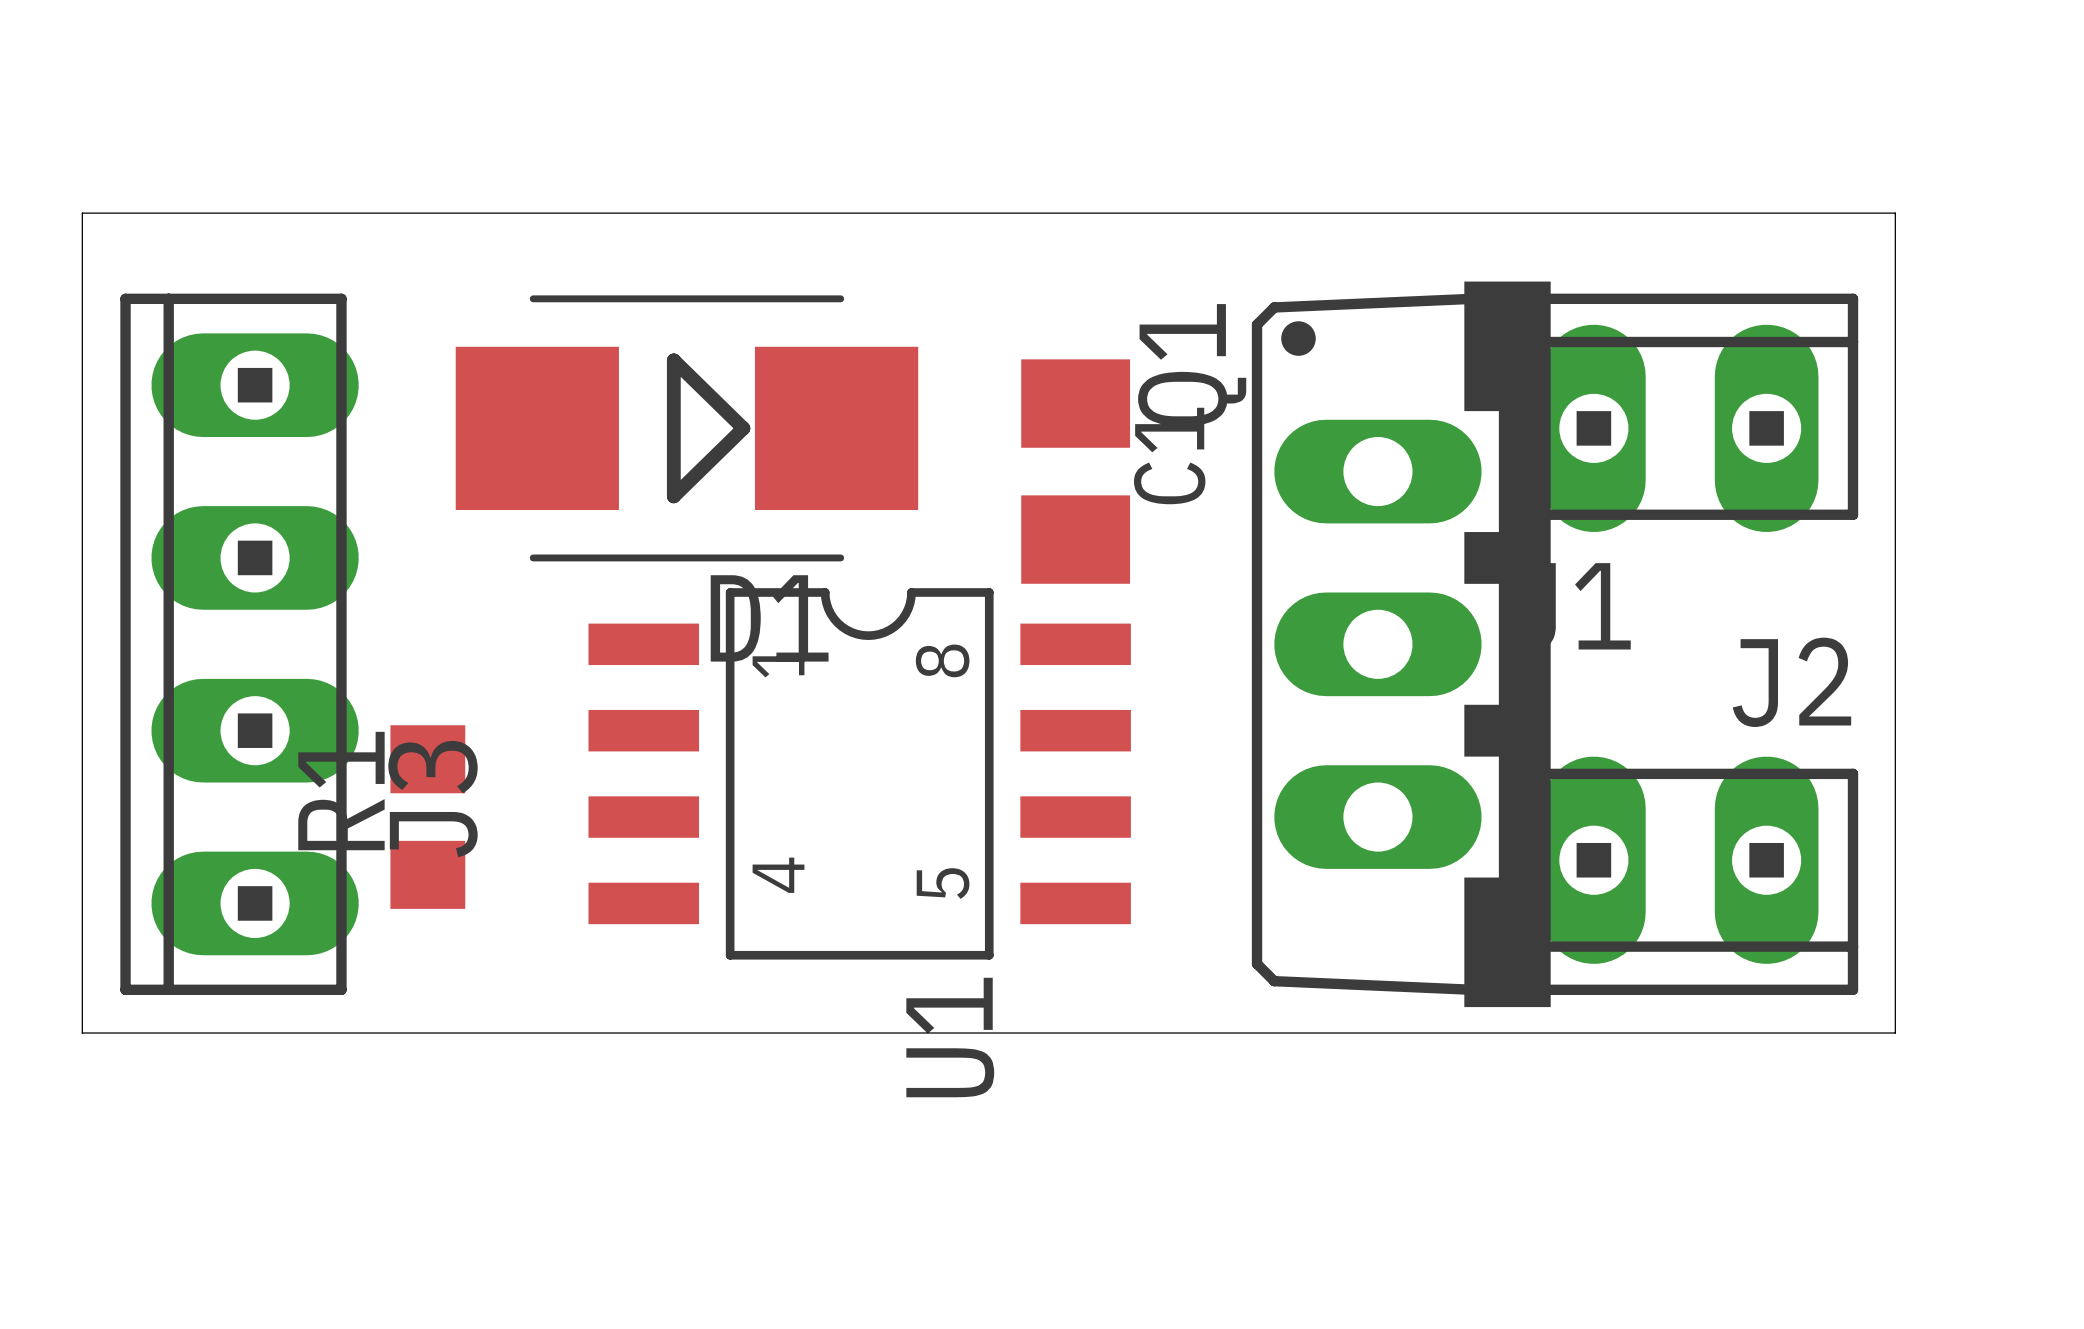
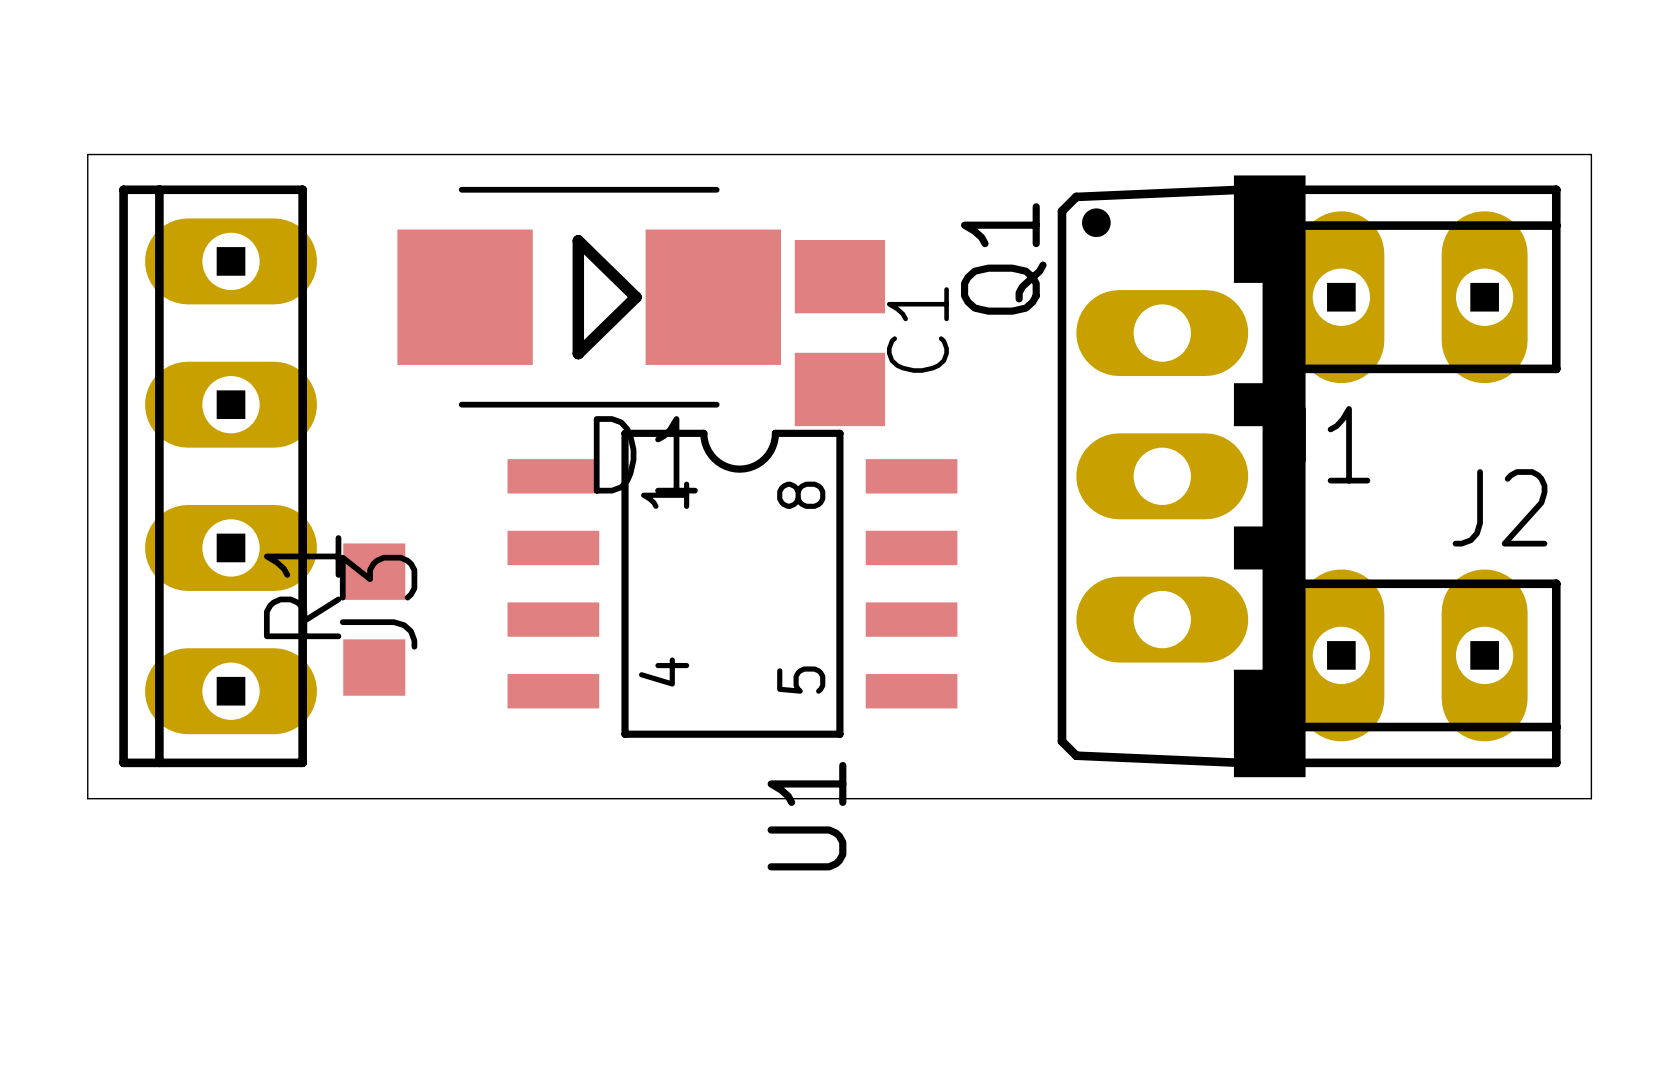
board edge: (82, 256) (82, 213) (1895, 213) (1895, 256) -> (87, 154) (1591, 154)
C1 position: (1075, 471) -> (839, 333)

